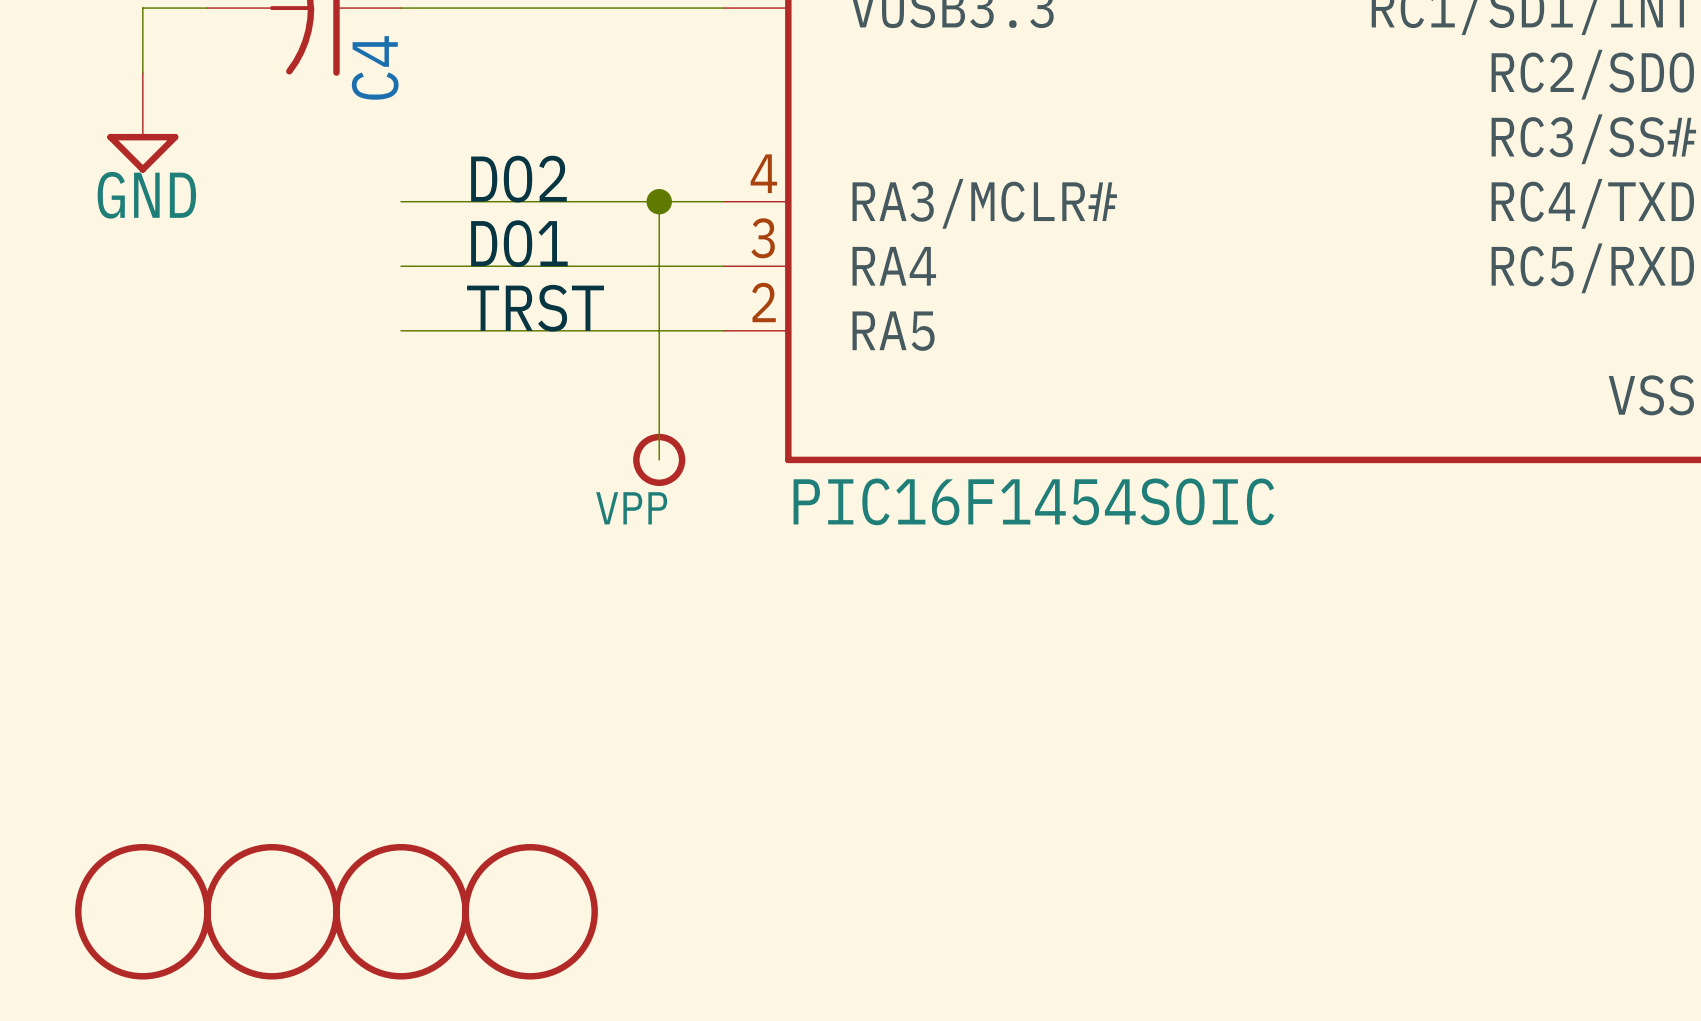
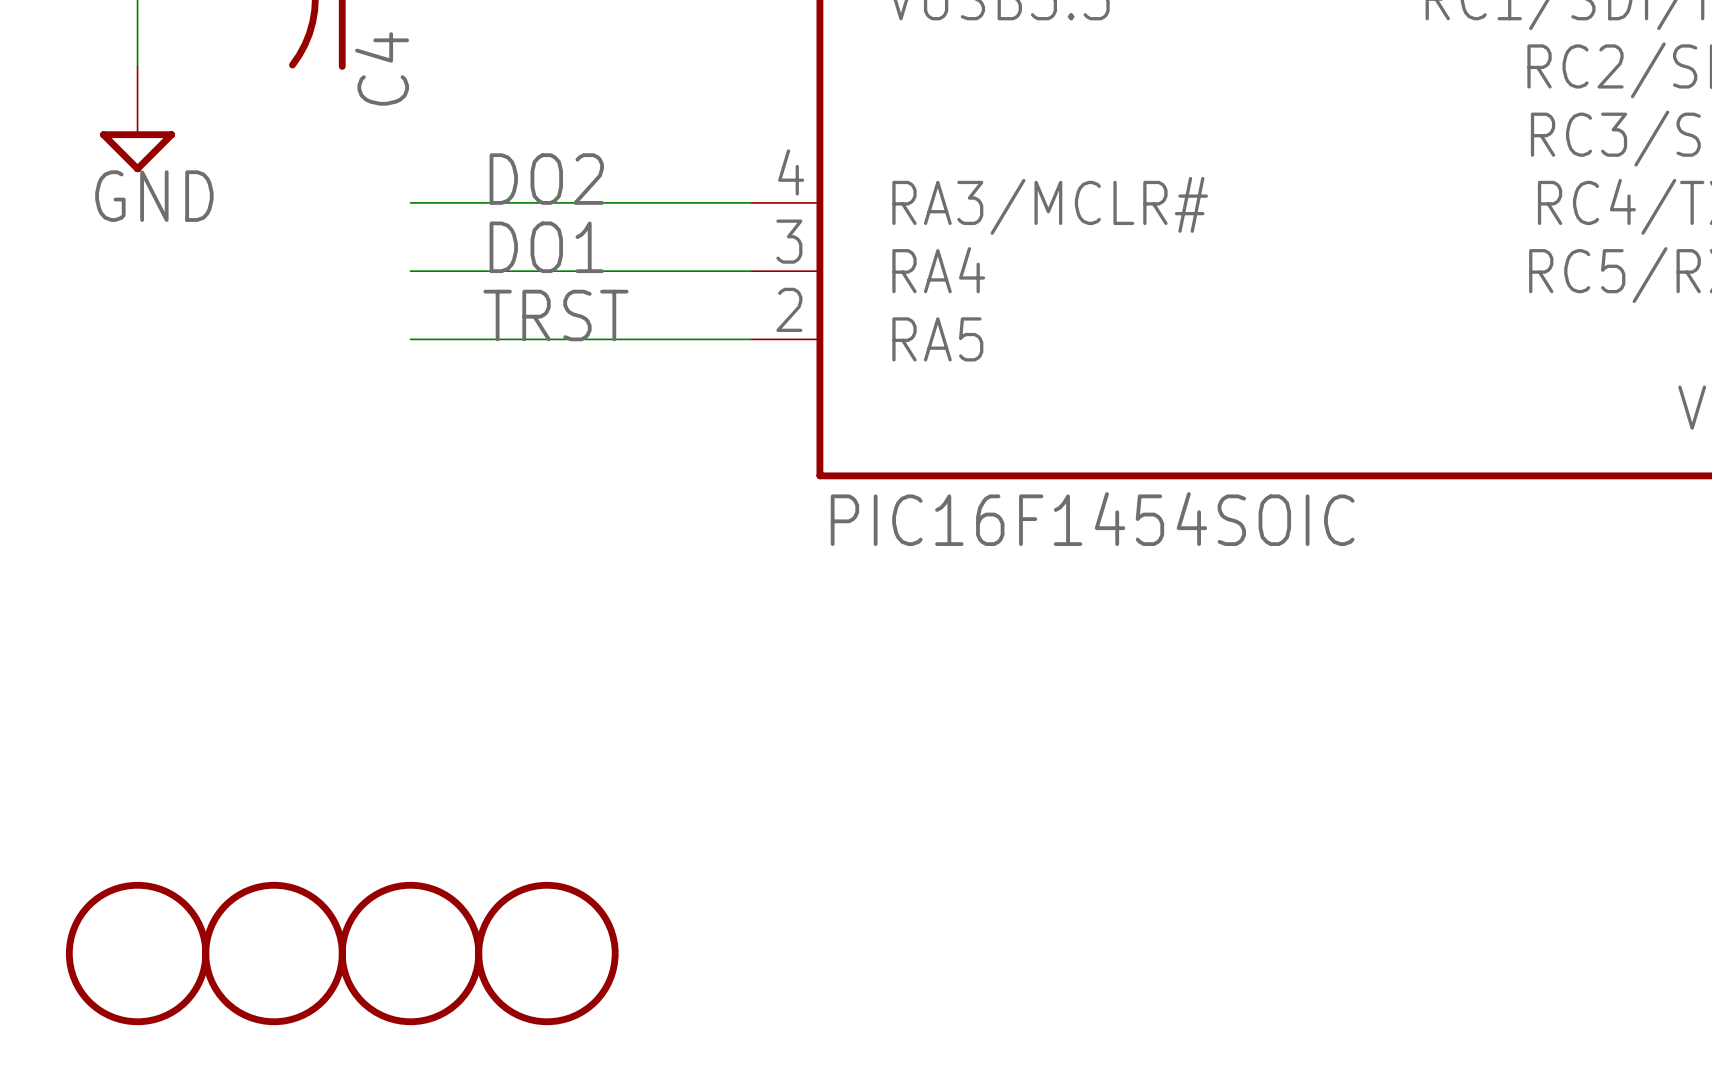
wire: (659, 201) (659, 459) -> none
junction: (659, 201) -> none
VPP: (659, 459) -> none

